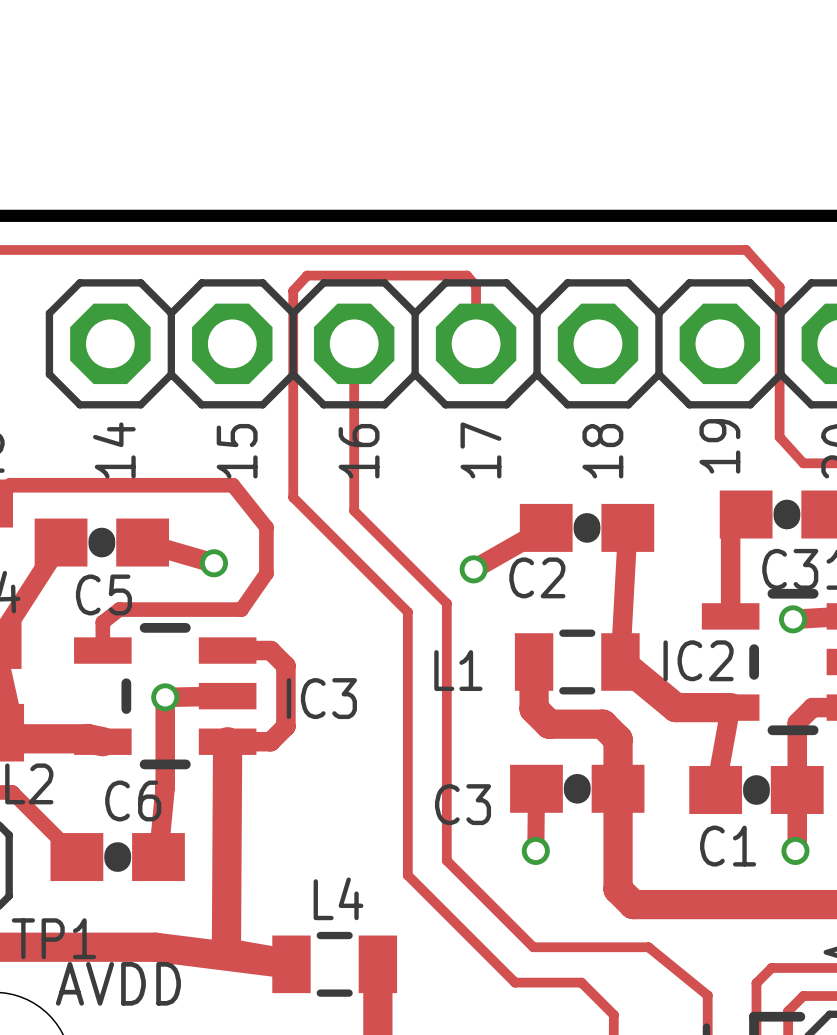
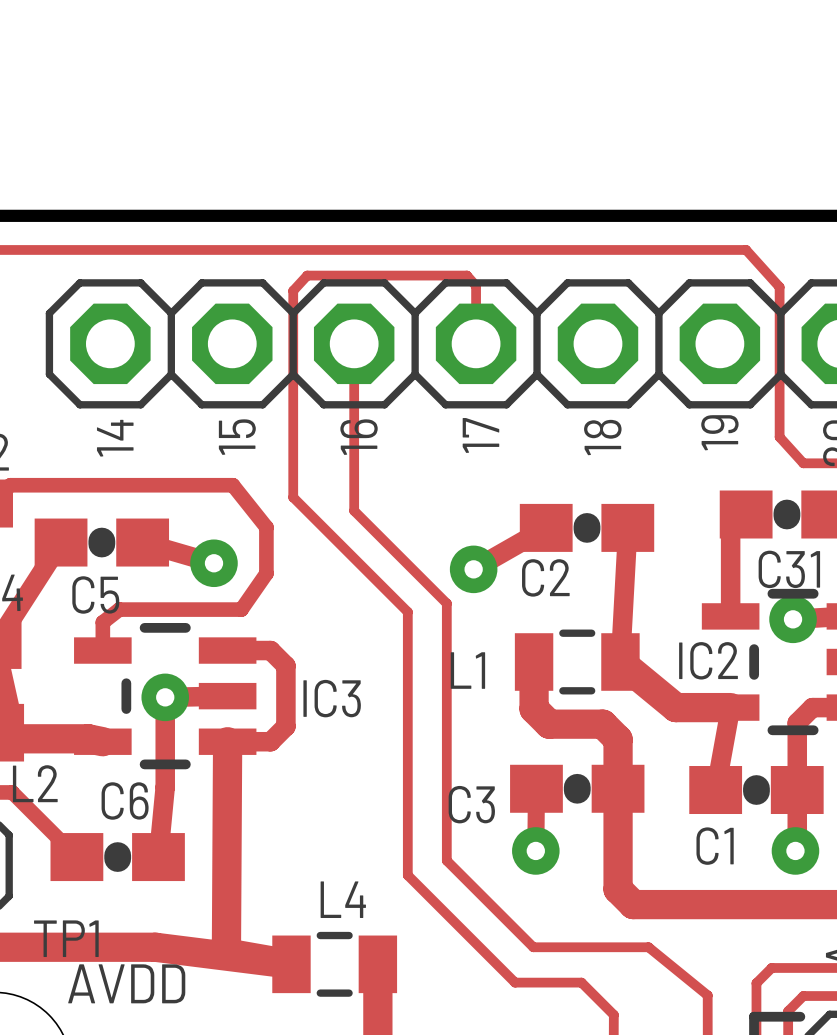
via size: [199, 549, 229, 578] -> [190, 539, 238, 588]
via size: [459, 555, 488, 584] -> [449, 545, 498, 594]
via size: [779, 605, 808, 634] -> [769, 595, 817, 644]
via size: [151, 683, 180, 712] -> [141, 673, 190, 722]
via size: [521, 836, 550, 865] -> [512, 827, 560, 875]
via size: [781, 836, 810, 865] -> [771, 827, 820, 875]

